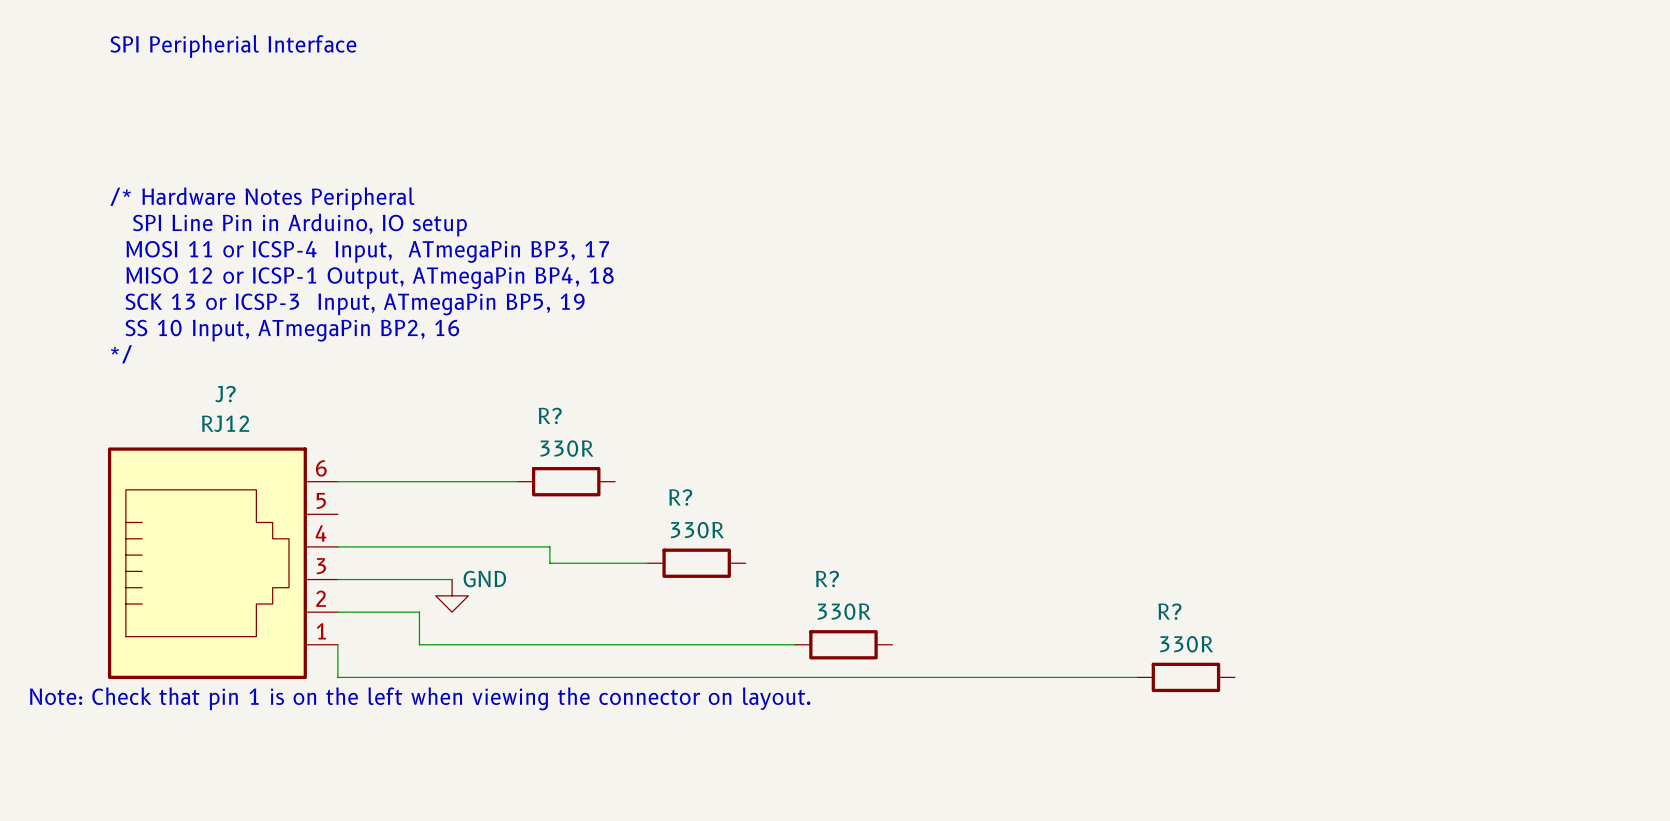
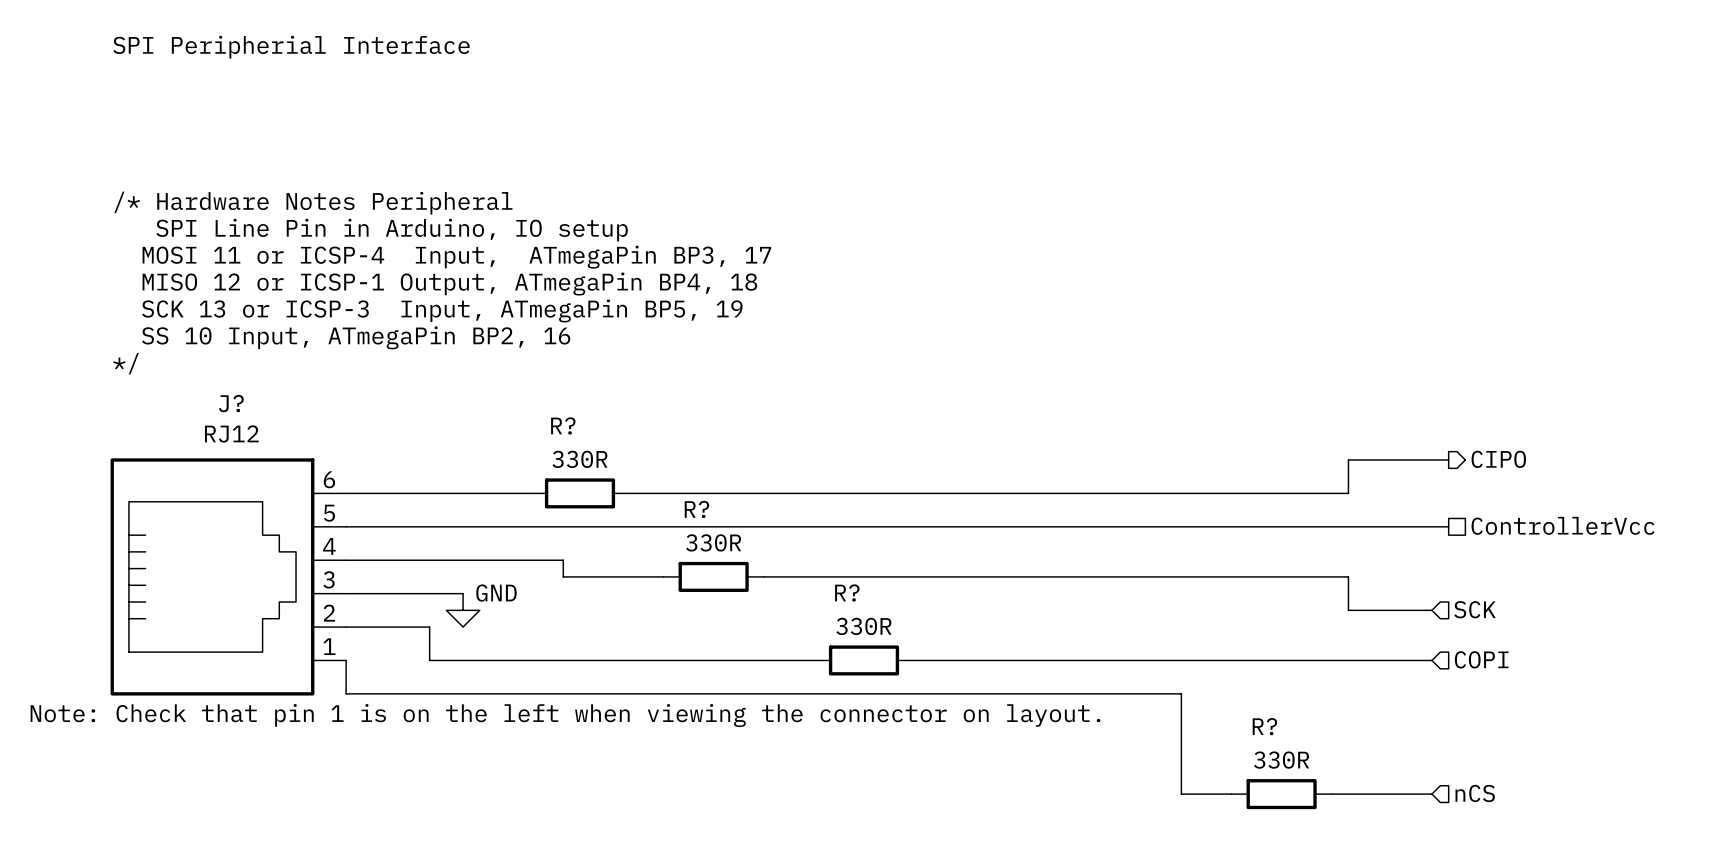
hierarchical label: none -> CIPO (1498, 459)
wire: none -> (1448, 460) (1348, 460) (1348, 493) (630, 493)
hierarchical label: none -> ControllerVcc (1563, 525)
wire: none -> (346, 526) (1448, 526)
wire: none -> (763, 576) (1348, 576) (1348, 610) (1431, 610)
hierarchical label: none -> SCK (1474, 609)
wire: none -> (914, 660) (1431, 660)
hierarchical label: none -> COPI (1481, 659)
wire: none -> (1164, 693) (1181, 693) (1181, 794) (1231, 794)
R? position: (1185, 677) -> (1281, 794)
hierarchical label: none -> nCS (1475, 793)
wire: none -> (1331, 794) (1431, 794)

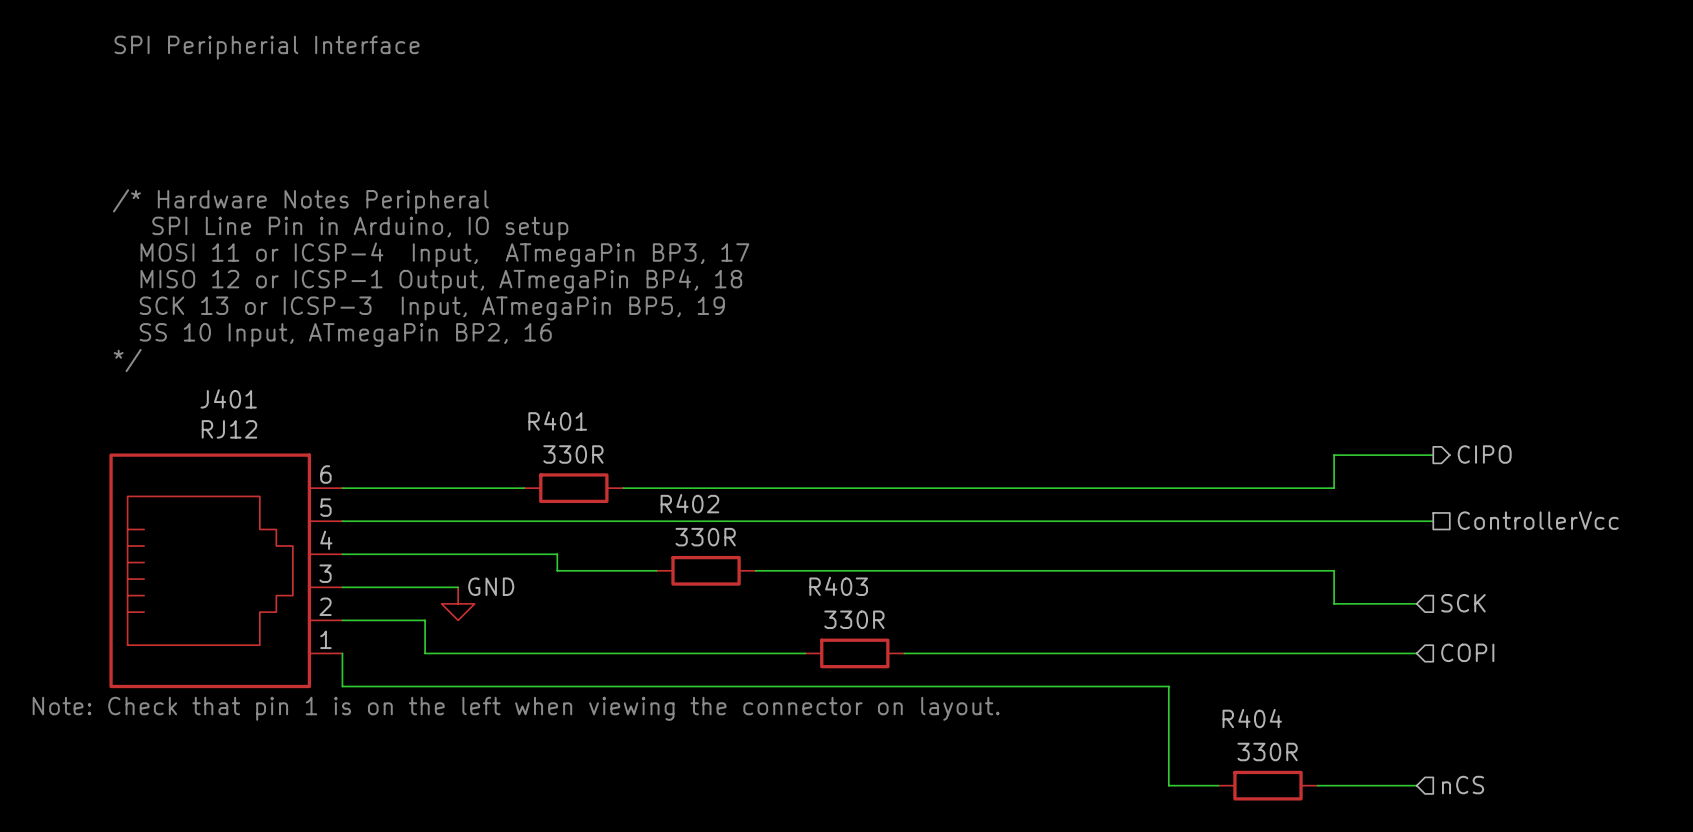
J? name: J? (231, 403) -> J401 (228, 398)
R? name: R? (563, 425) -> R401 (557, 421)
R? name: R? (696, 509) -> R402 (689, 503)
R? name: R? (847, 592) -> R403 (838, 586)
R? name: R? (1264, 726) -> R404 (1252, 718)

